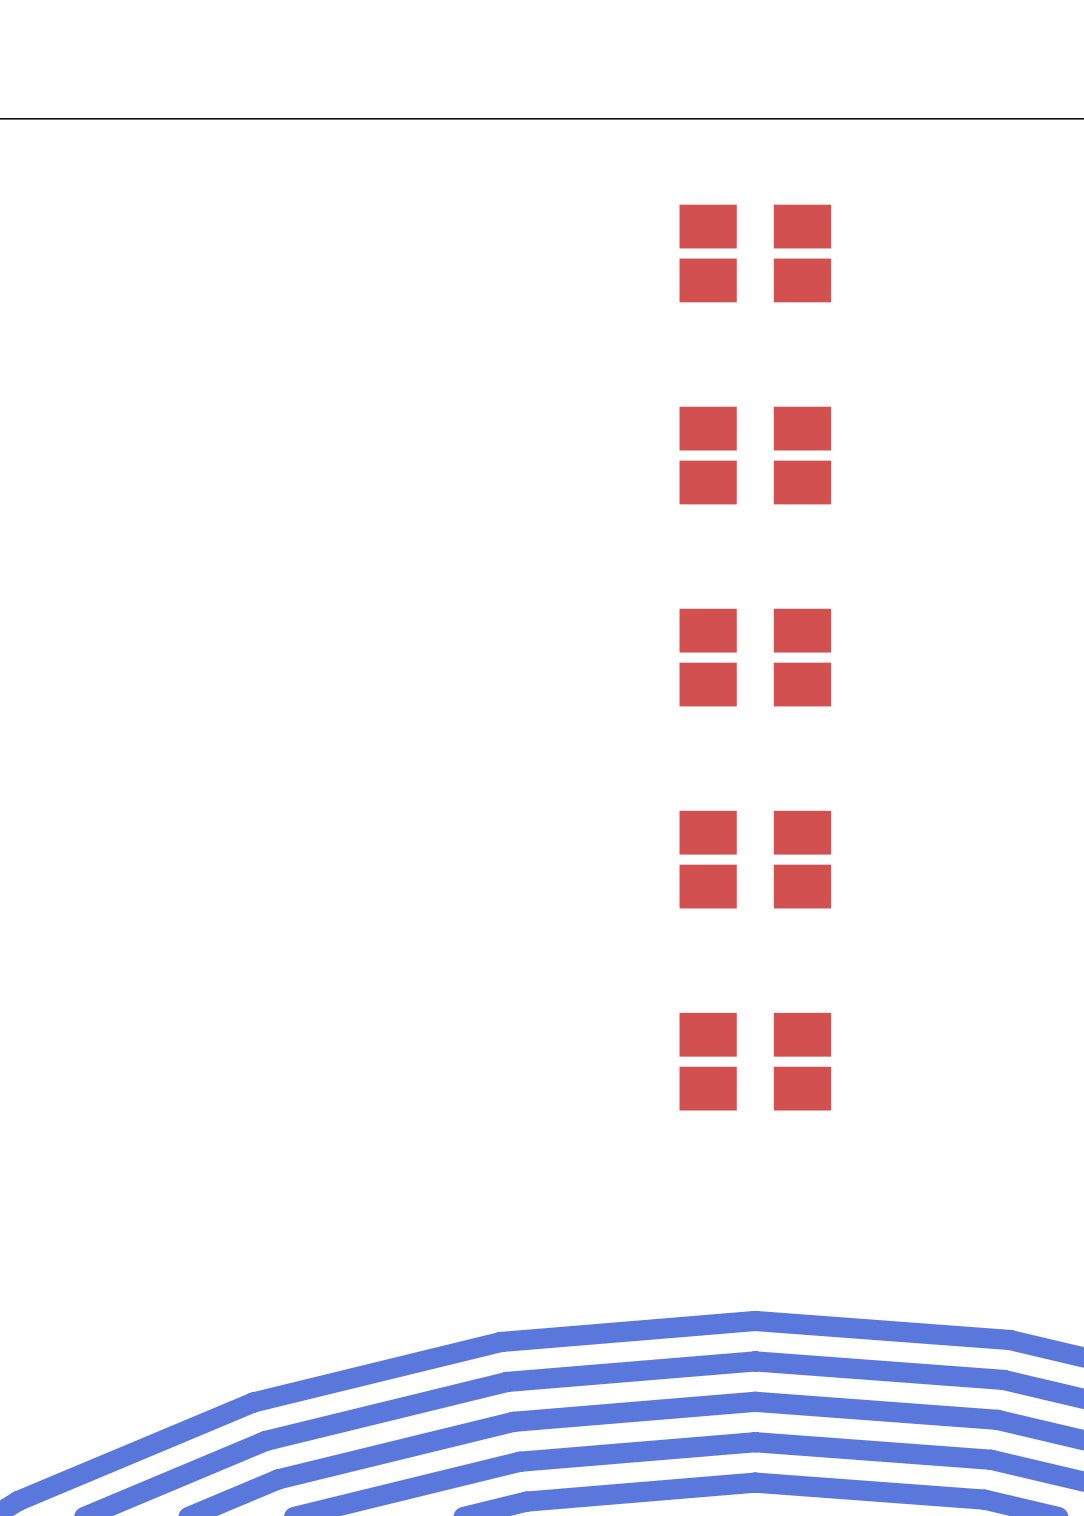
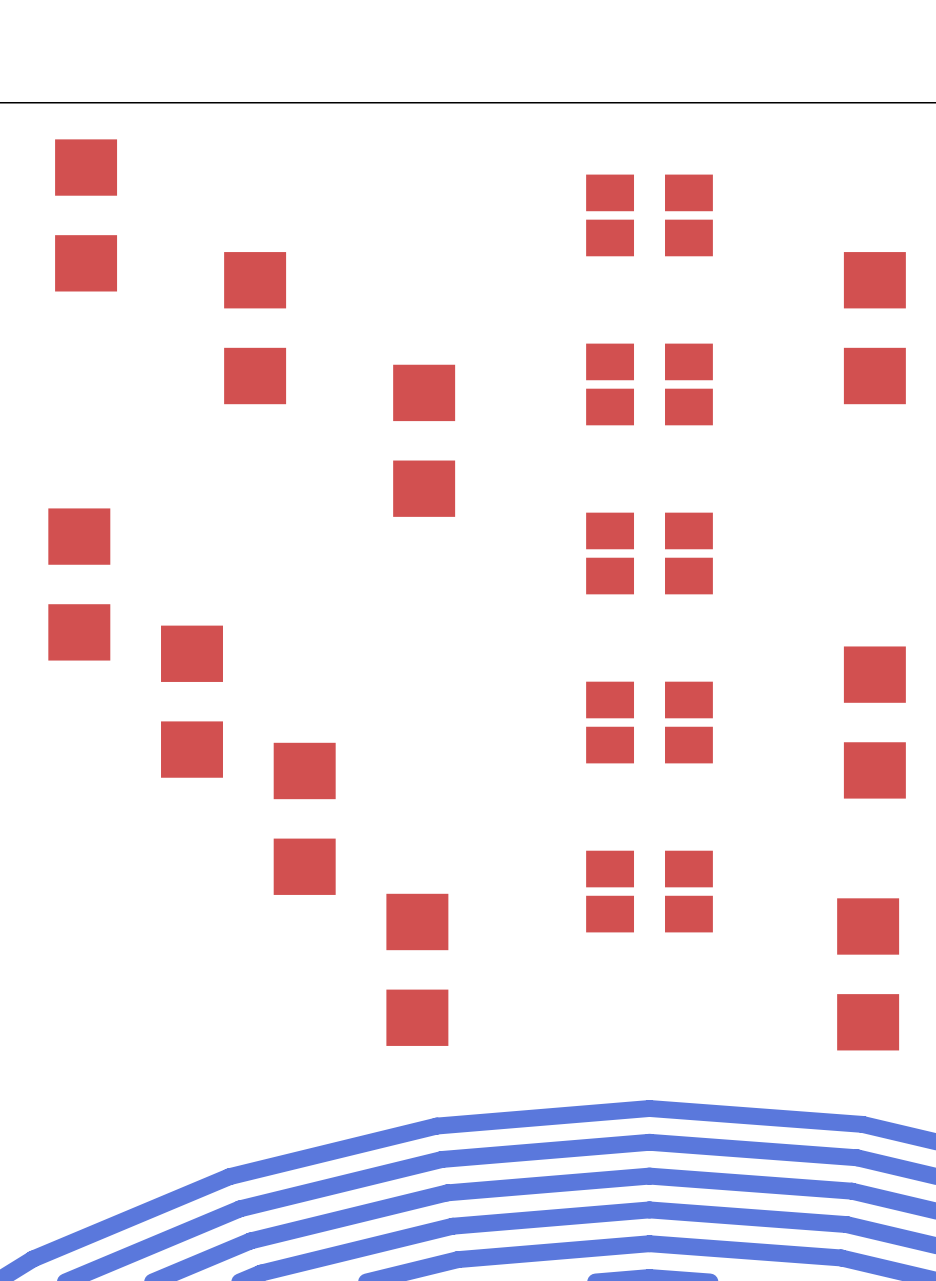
part: none -> (86, 215)
part: none -> (255, 328)
part: none -> (874, 328)
part: none -> (424, 440)
part: none -> (79, 584)
part: none -> (192, 701)
part: none -> (874, 722)
part: none -> (304, 818)
part: none -> (417, 969)
part: none -> (868, 974)

